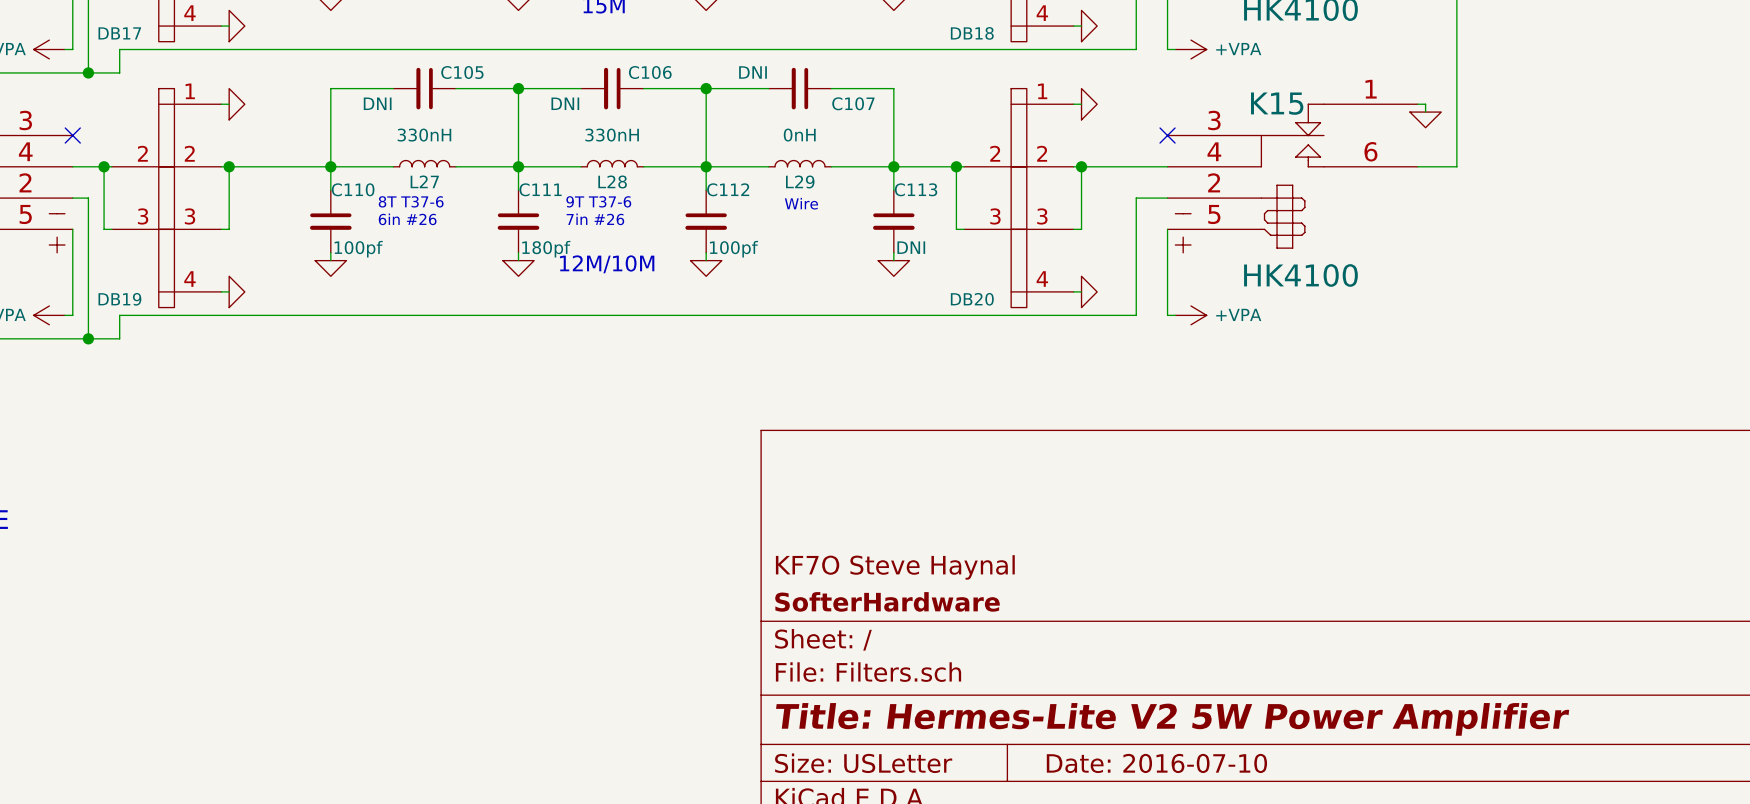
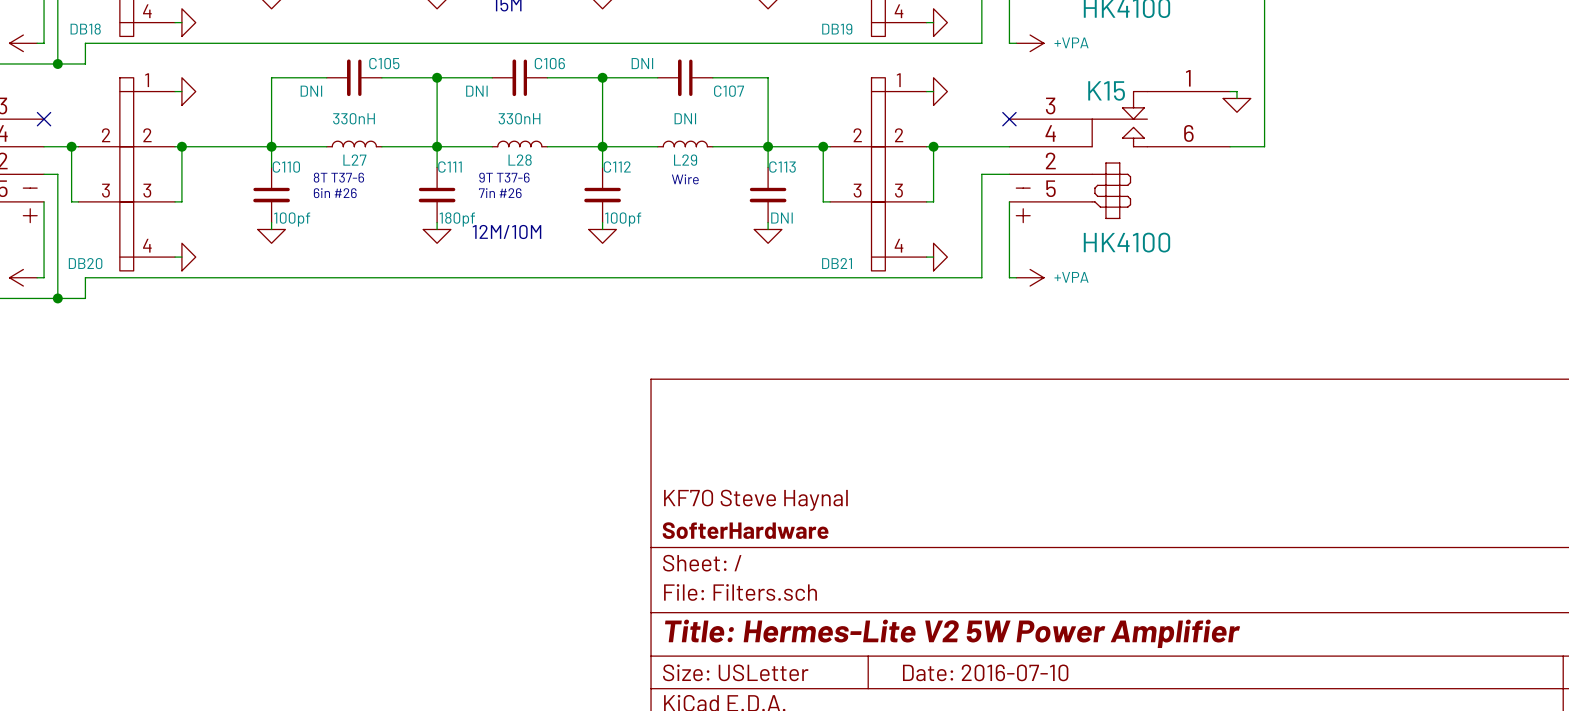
DB17 name: DB17 (119, 33) -> DB18 (85, 29)
DB18 name: DB18 (972, 33) -> DB19 (837, 29)
L29 value: 0nH (799, 135) -> DNI (685, 118)
DB19 name: DB19 (119, 299) -> DB20 (85, 263)
DB20 name: DB20 (972, 299) -> DB21 (837, 263)

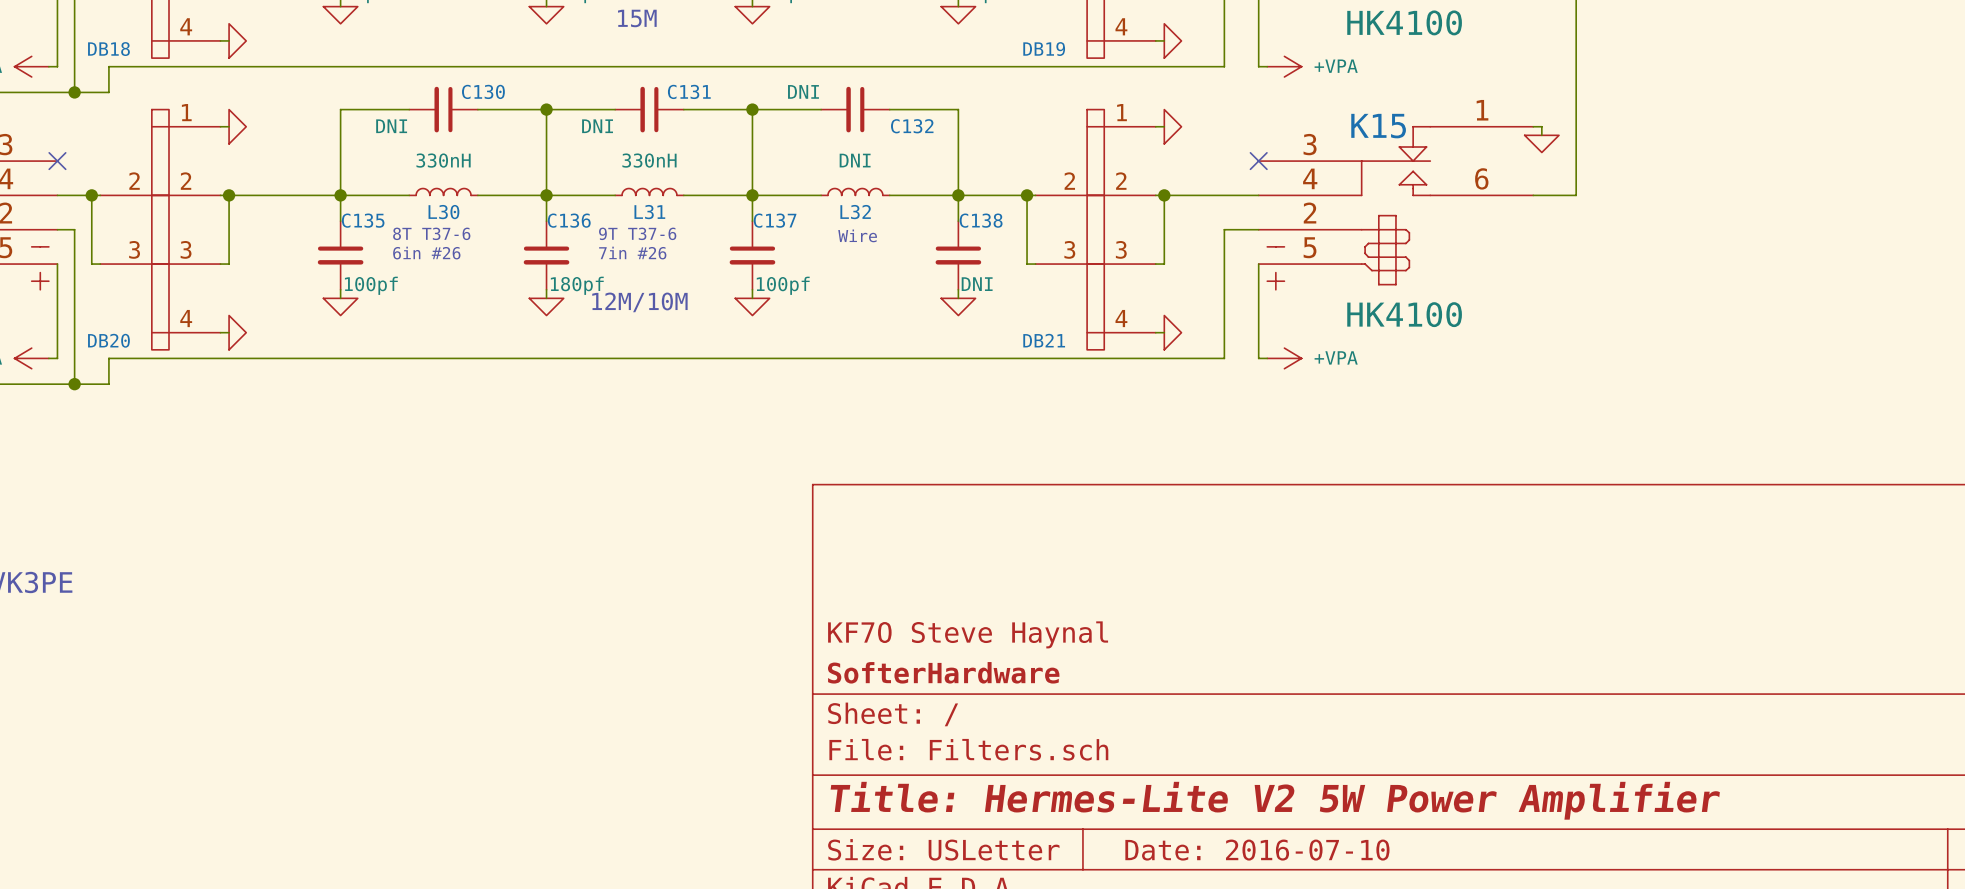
C105 name: C105 (384, 63) -> C130 (483, 91)
C106 name: C106 (549, 63) -> C131 (689, 91)
C107 name: C107 (729, 91) -> C132 (912, 126)
L27 name: L27 (354, 160) -> L30 (443, 212)
L28 name: L28 (520, 160) -> L31 (649, 212)
L29 name: L29 (685, 160) -> L32 (855, 212)
C110 name: C110 (286, 167) -> C135 (363, 220)
C111 name: C111 (449, 167) -> C136 (569, 220)
C112 name: C112 (617, 167) -> C137 (775, 220)
C113 name: C113 (782, 167) -> C138 (981, 220)

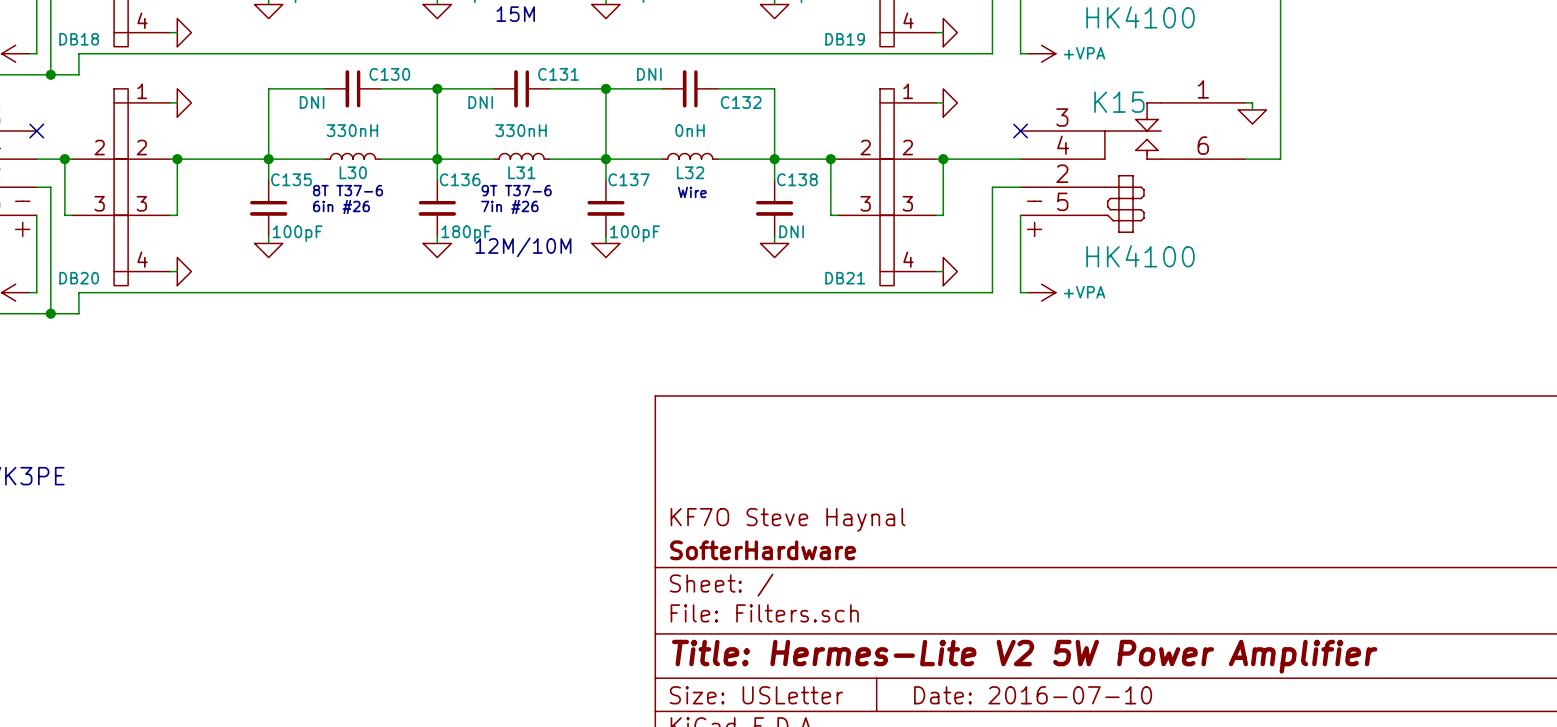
L32 value: DNI (855, 160) -> 0nH (690, 130)
C135 value: 100pf (371, 285) -> 100pF (297, 233)
C136 value: 180pf (577, 285) -> 180pF (466, 233)
C137 value: 100pf (783, 285) -> 100pF (635, 233)

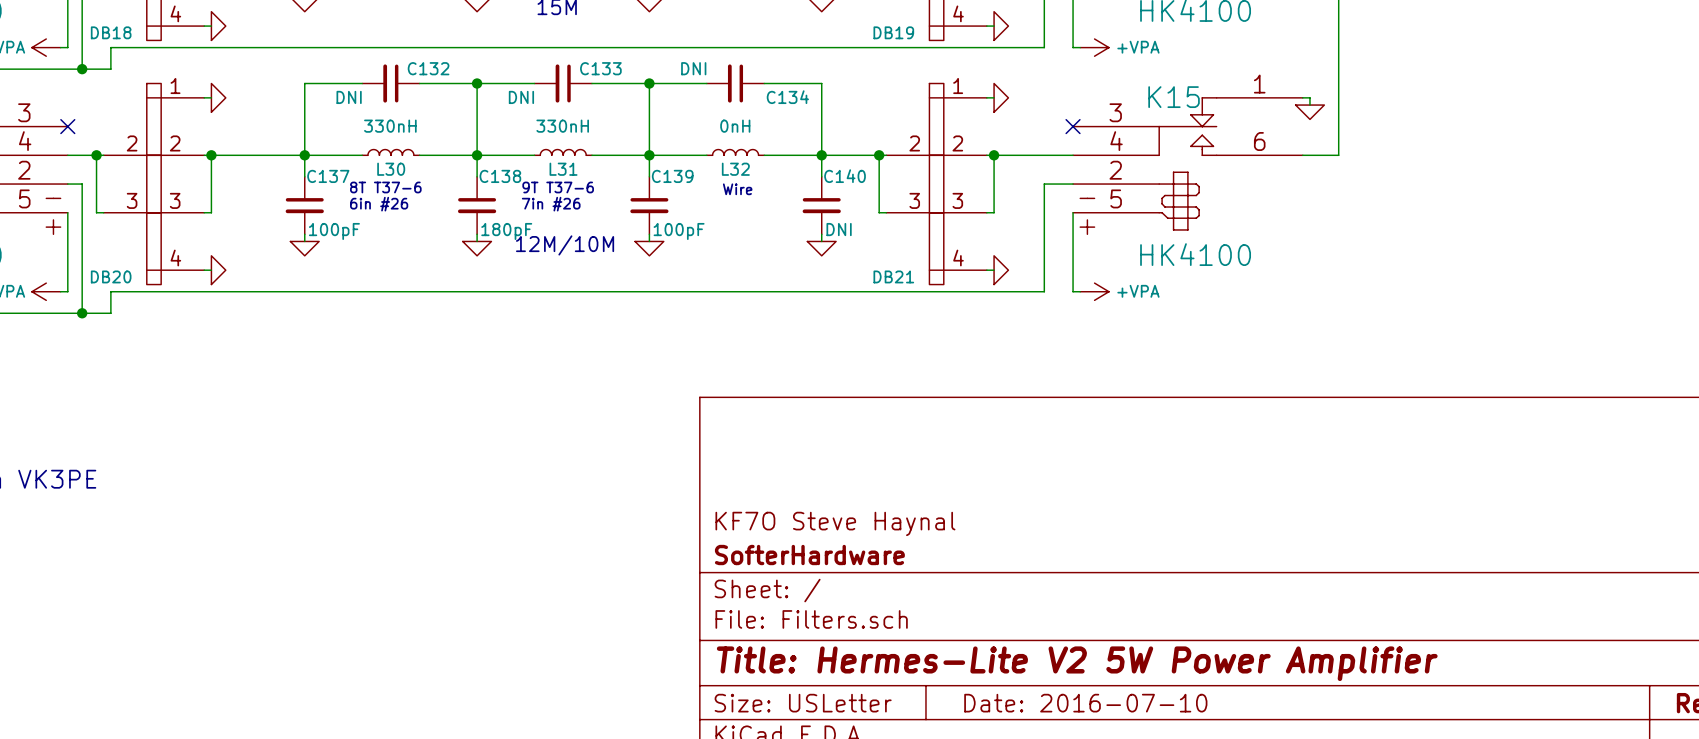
C130 name: C130 (389, 74) -> C132 (428, 68)
C131 name: C131 (558, 74) -> C133 (600, 68)
C132 name: C132 (741, 102) -> C134 (787, 97)
C135 name: C135 (291, 179) -> C137 (328, 176)
C136 name: C136 (460, 179) -> C138 (500, 176)
C137 name: C137 (629, 179) -> C139 (672, 176)
C138 name: C138 (797, 179) -> C140 (845, 176)

